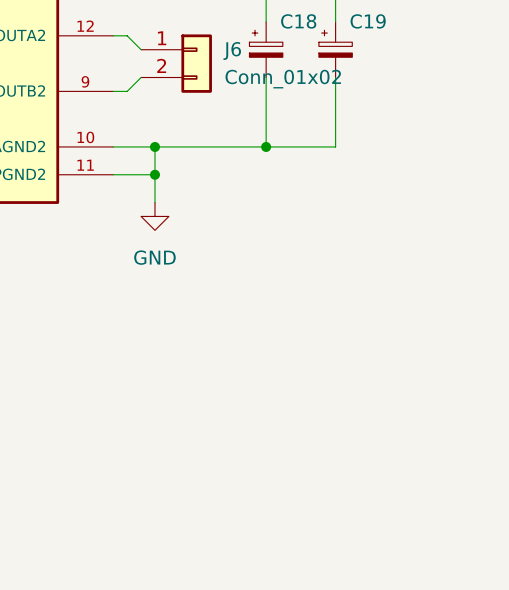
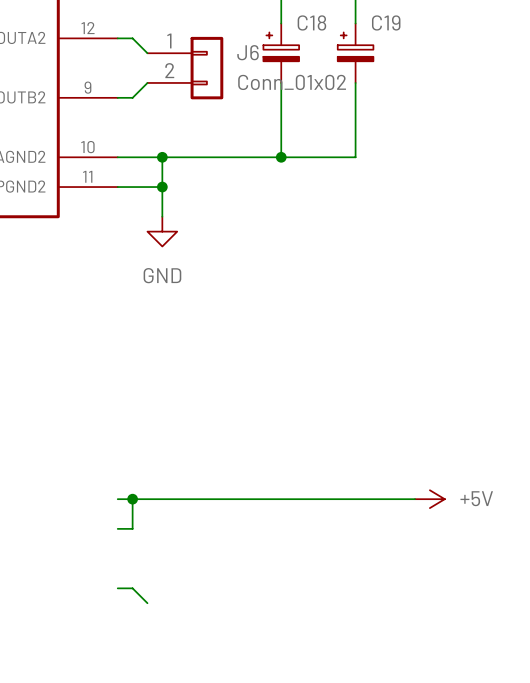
wire: none -> (117, 499) (415, 499)
wire: none -> (132, 499) (132, 528) (117, 528)
junction: none -> (132, 499)
power symbol: none -> +5V (429, 499)
wire: none -> (117, 588) (132, 588) (147, 603)

